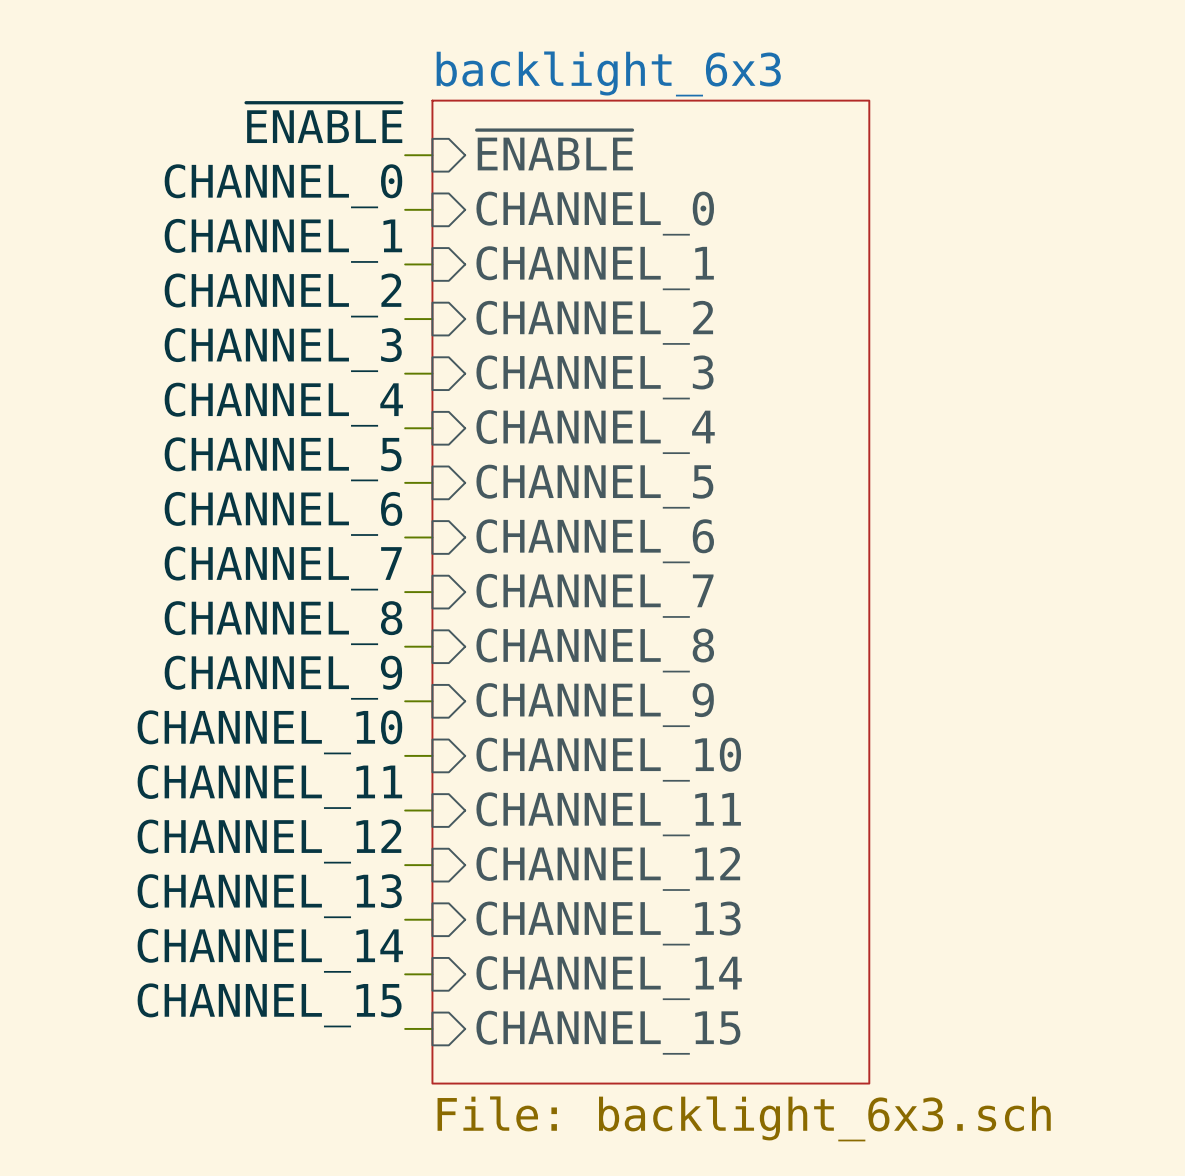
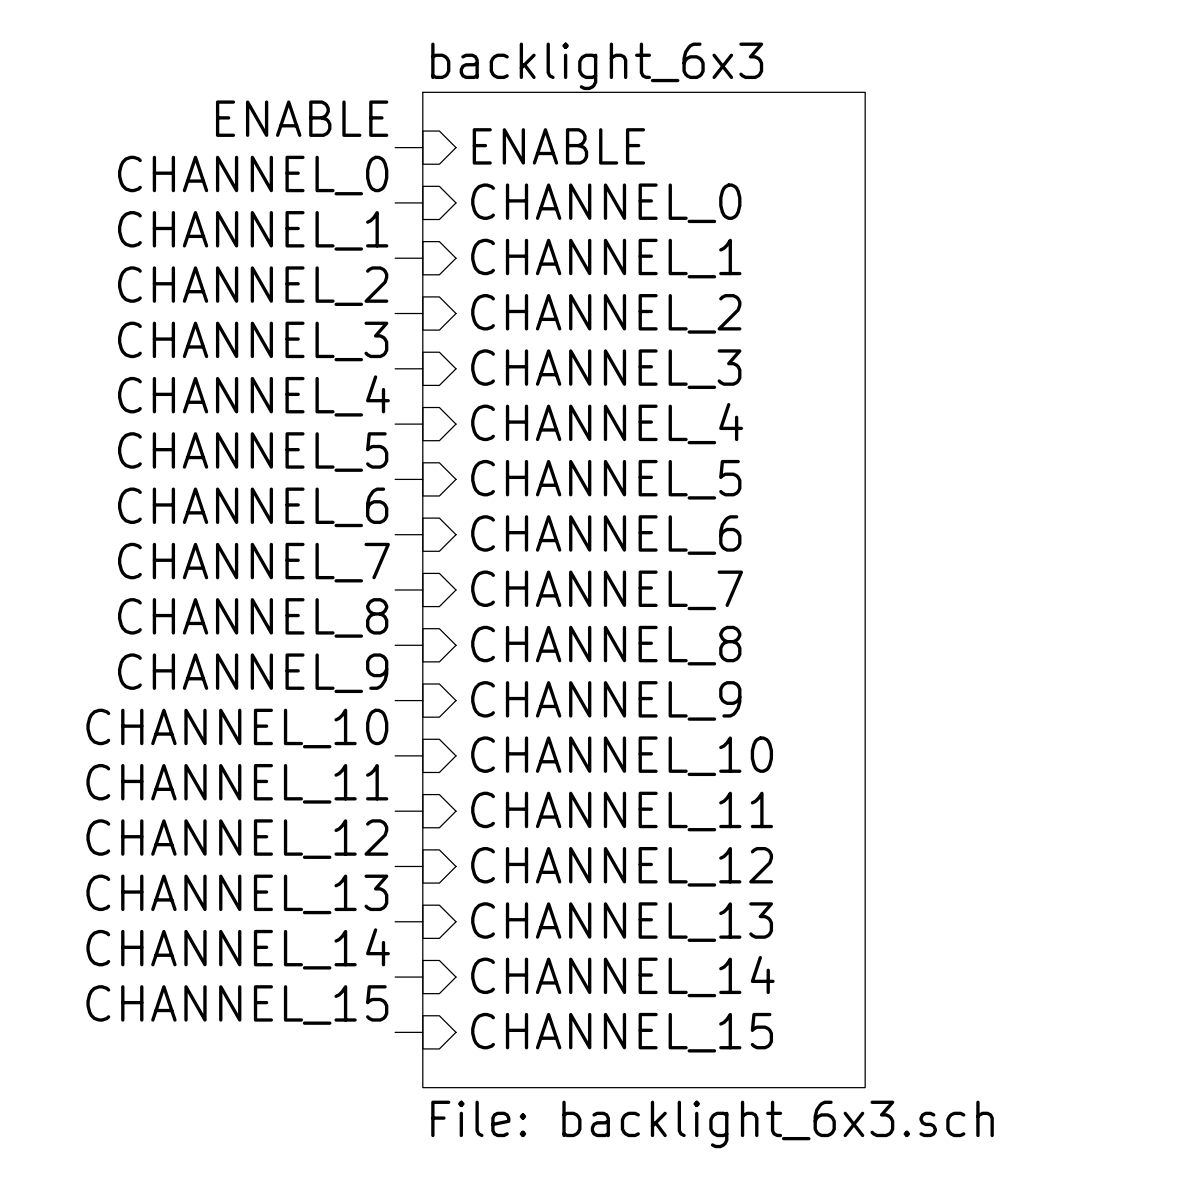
label: ~{ENABLE} (324, 122) -> ENABLE (302, 118)
sheet pin: ~{ENABLE} (554, 150) -> ENABLE (558, 146)

